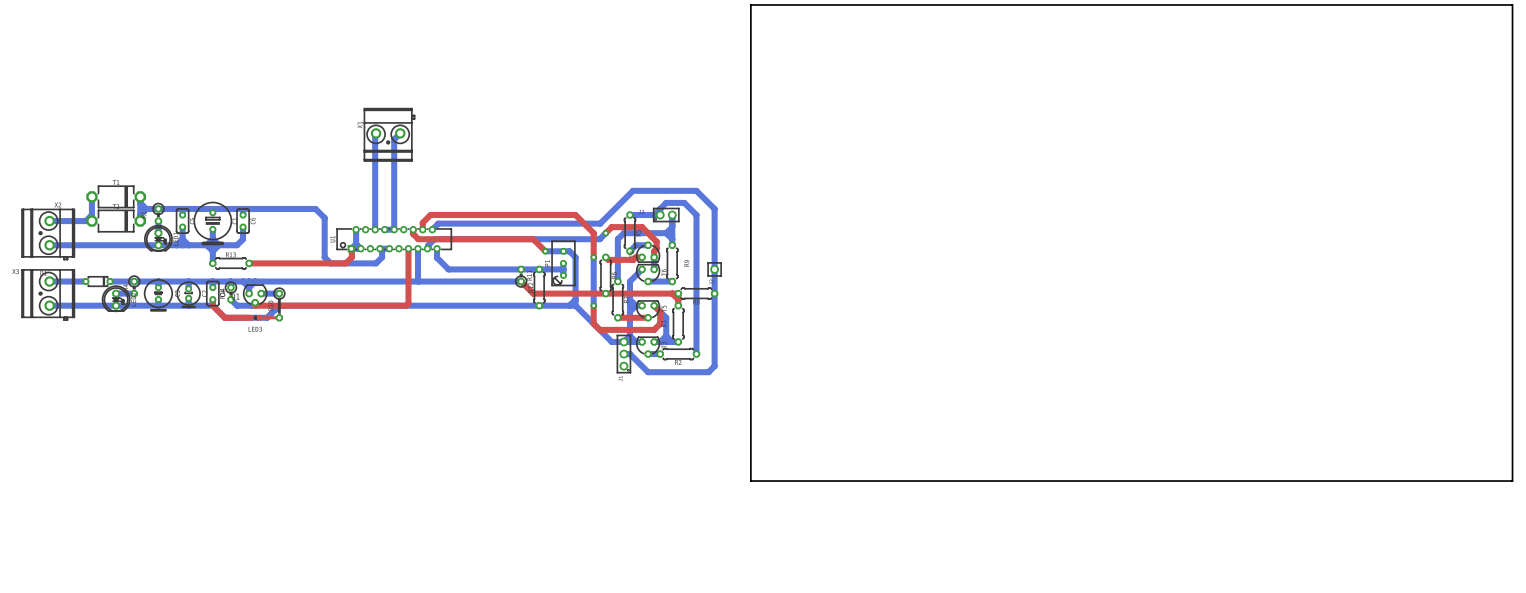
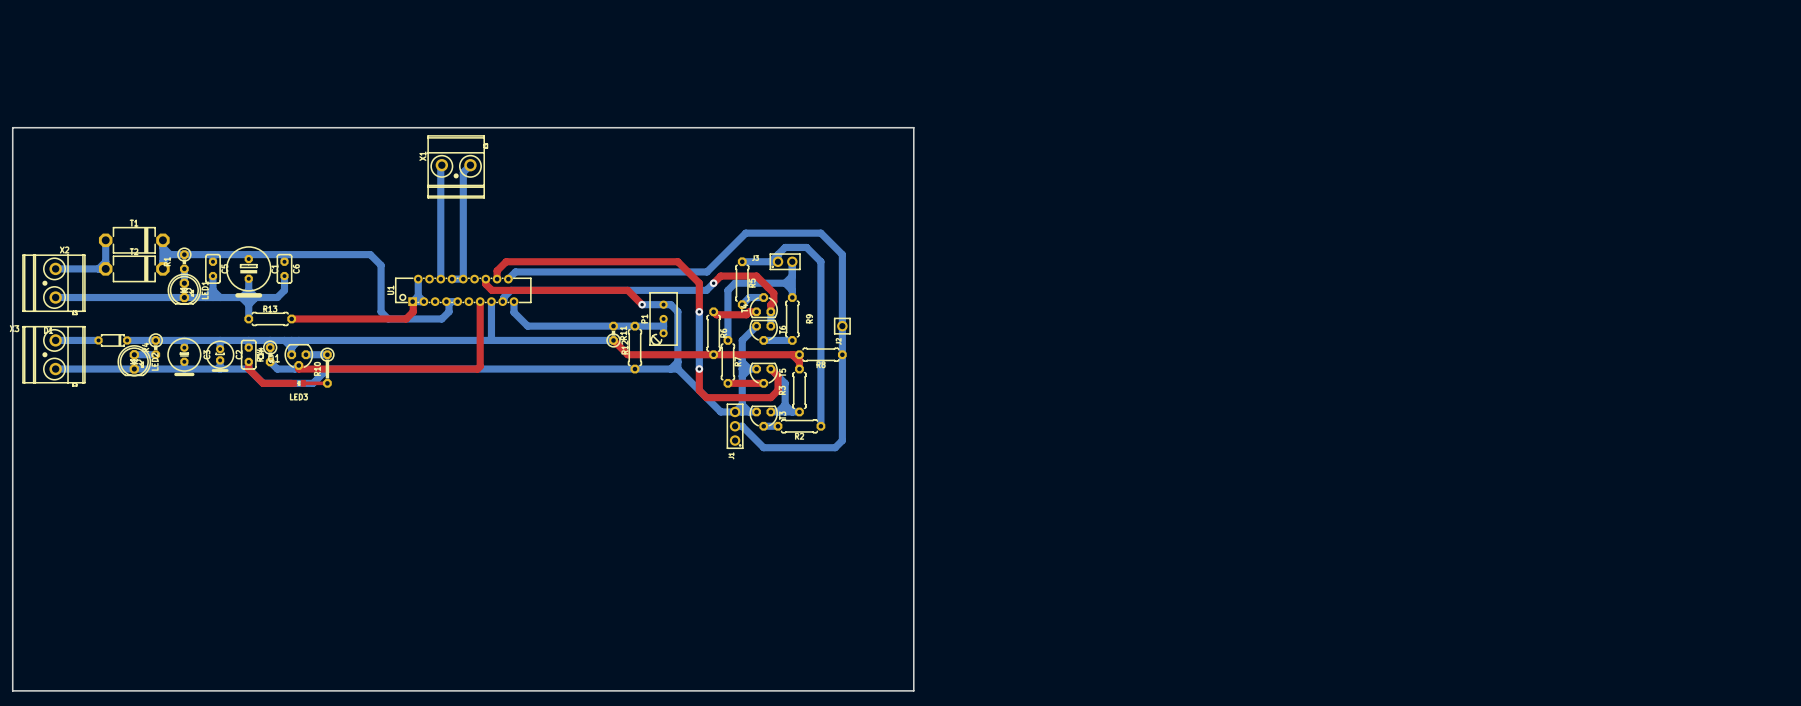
board edge: (750, 5) (1512, 5) (1512, 481) (750, 481) (750, 5) -> none
board edge: none -> (12, 127) (913, 127) (913, 690) (12, 690) (12, 127)

